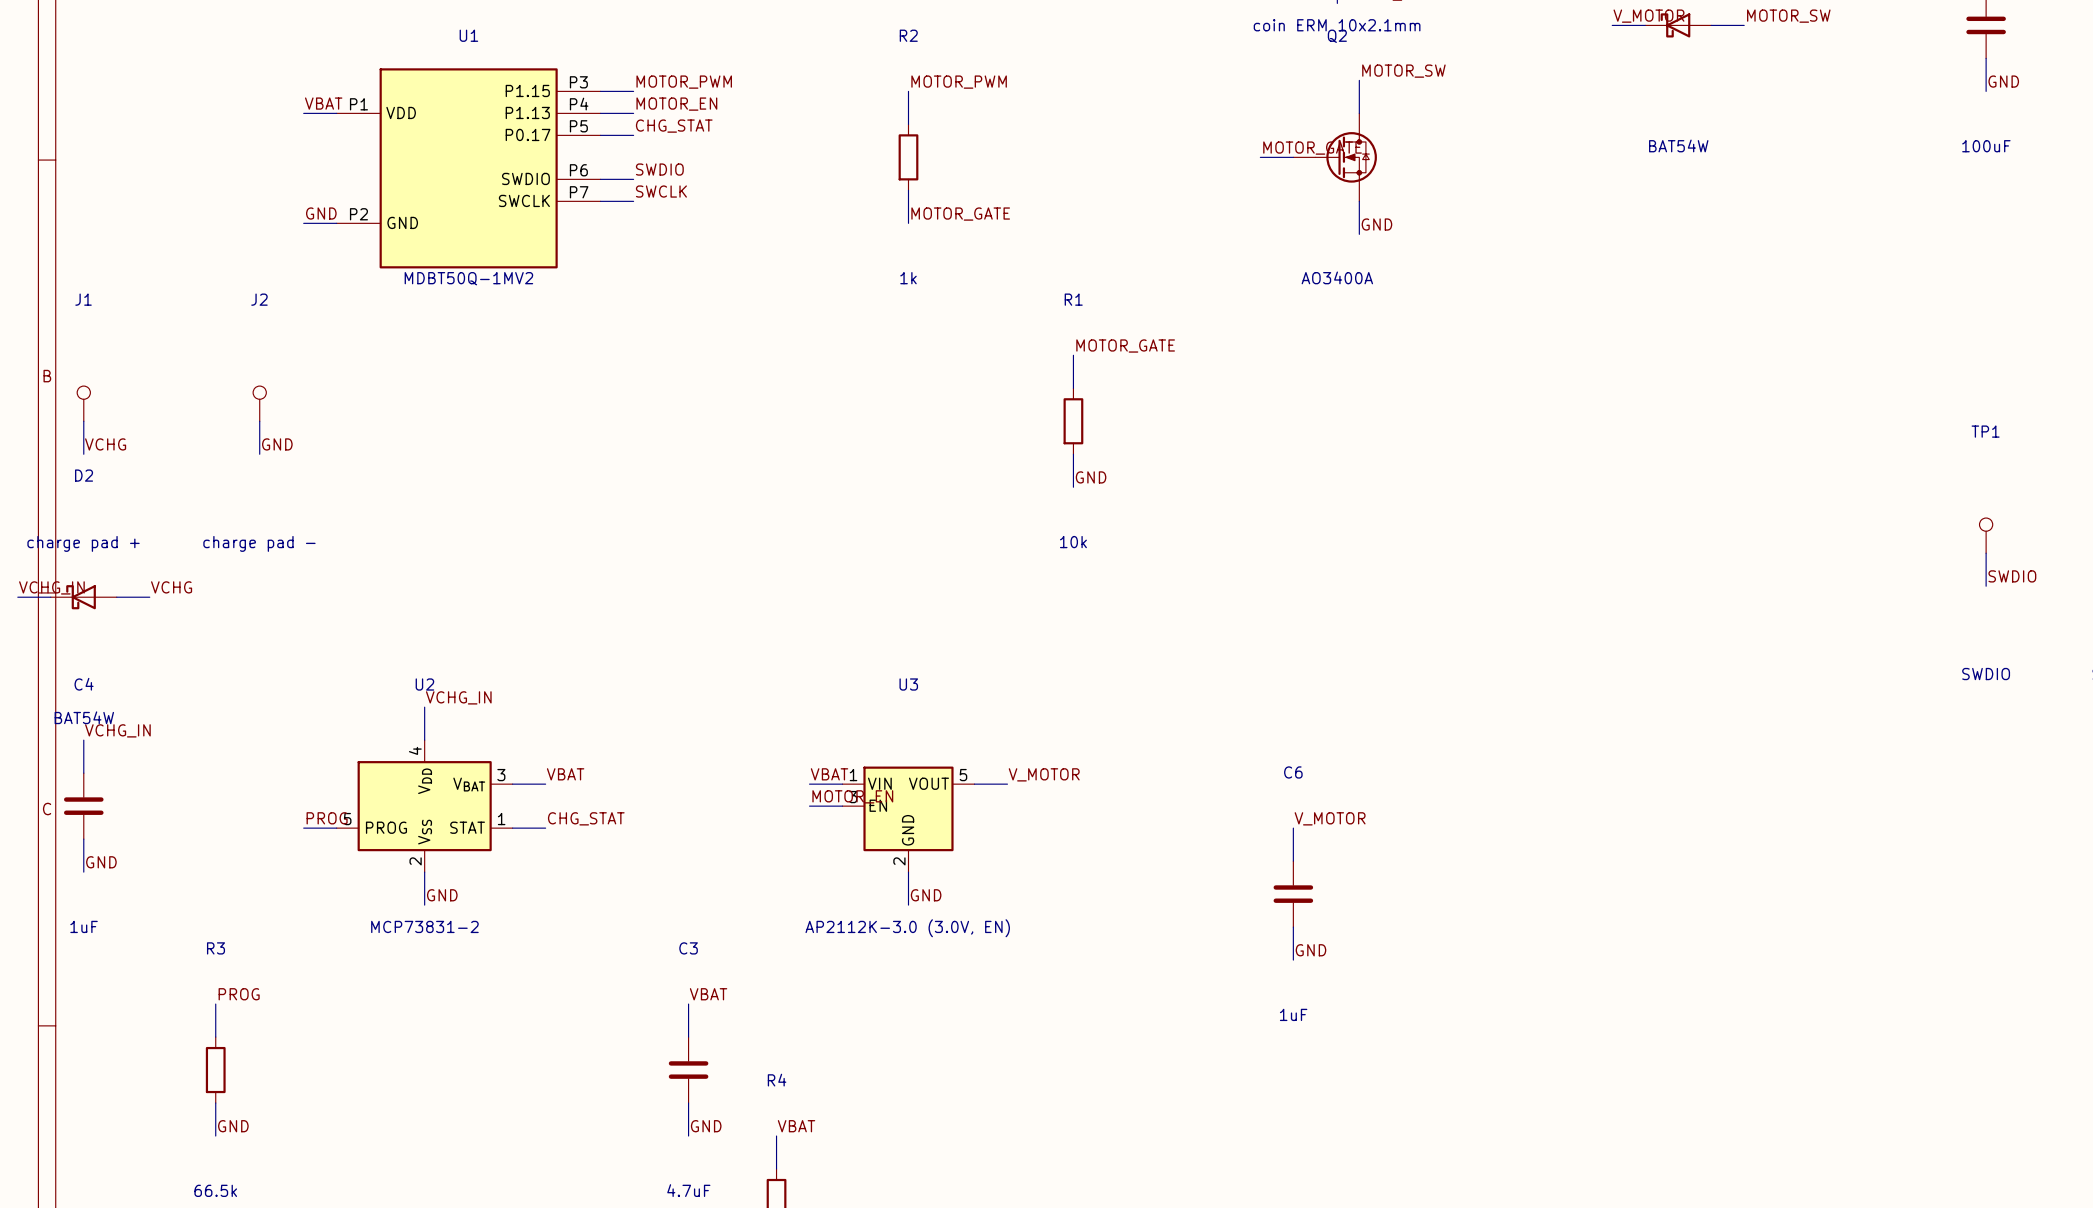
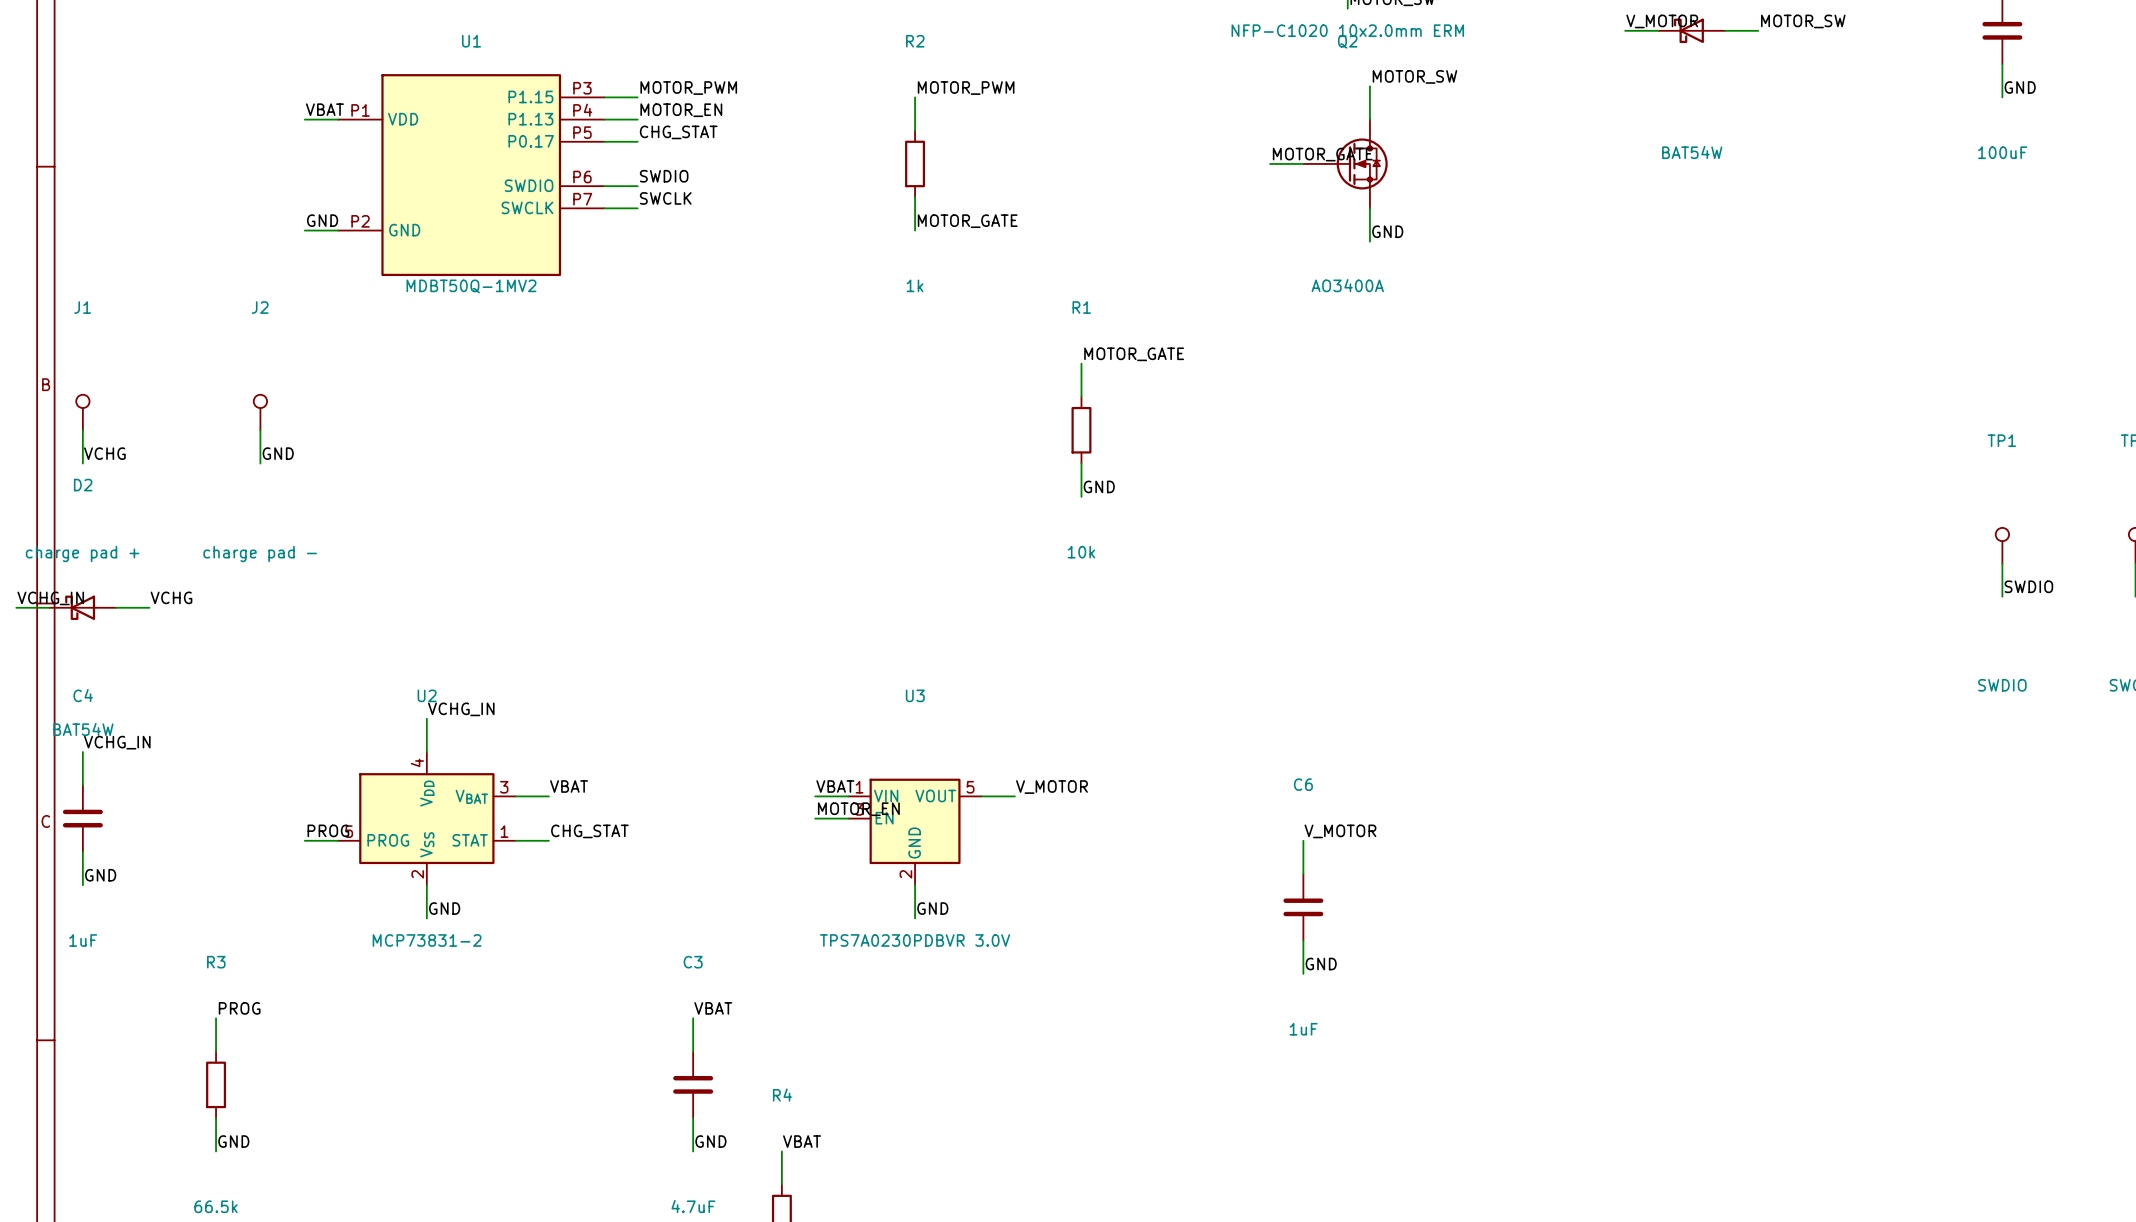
part value: coin ERM 10x2.1mm (1337, 25) -> NFP-C1020 10x2.0mm ERM (1347, 30)
U3 value: AP2112K-3.0 (3.0V, EN) (907, 928) -> TPS7A0230PDBVR 3.0V (915, 940)

